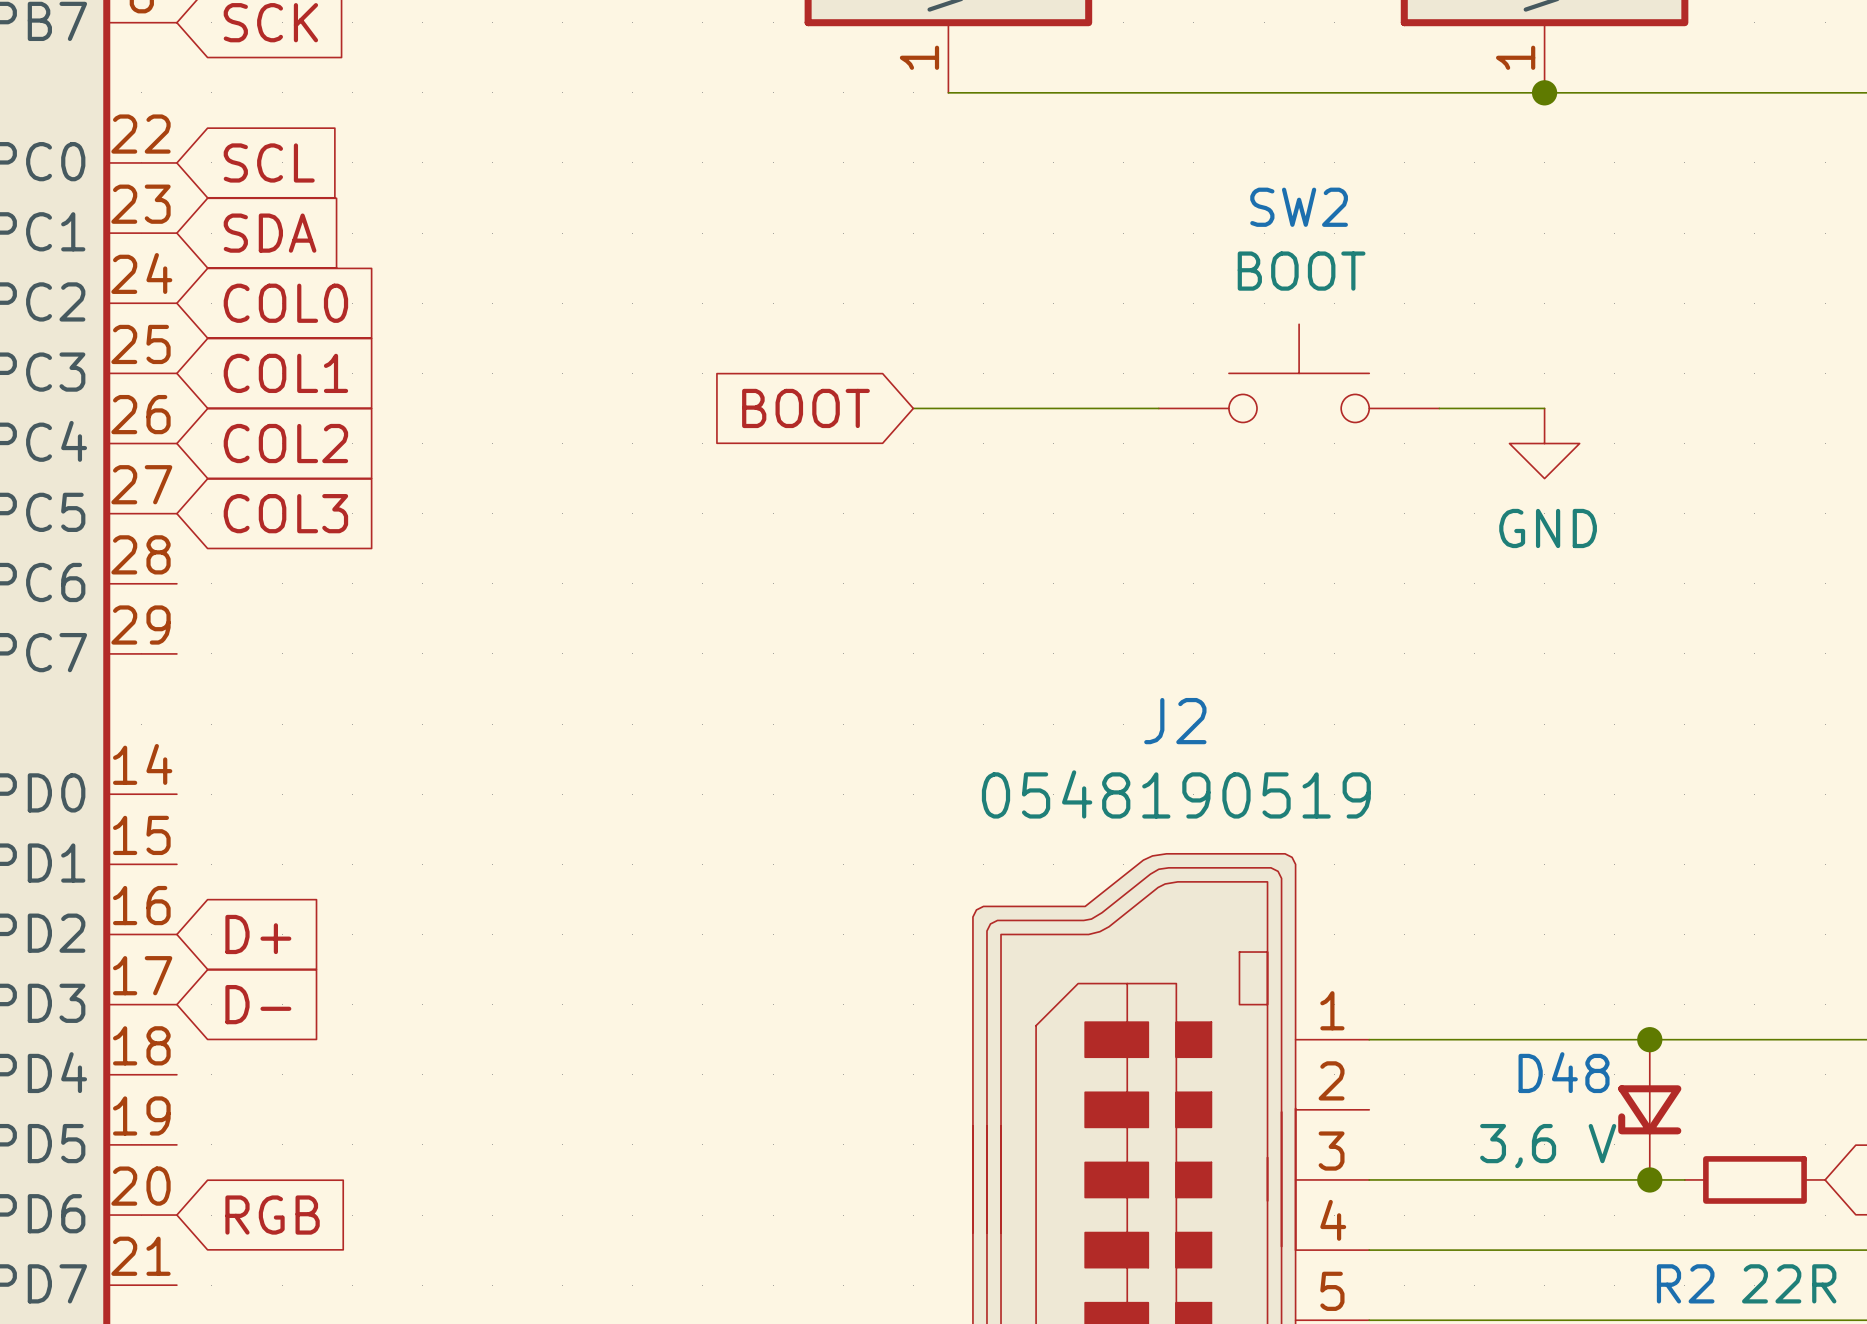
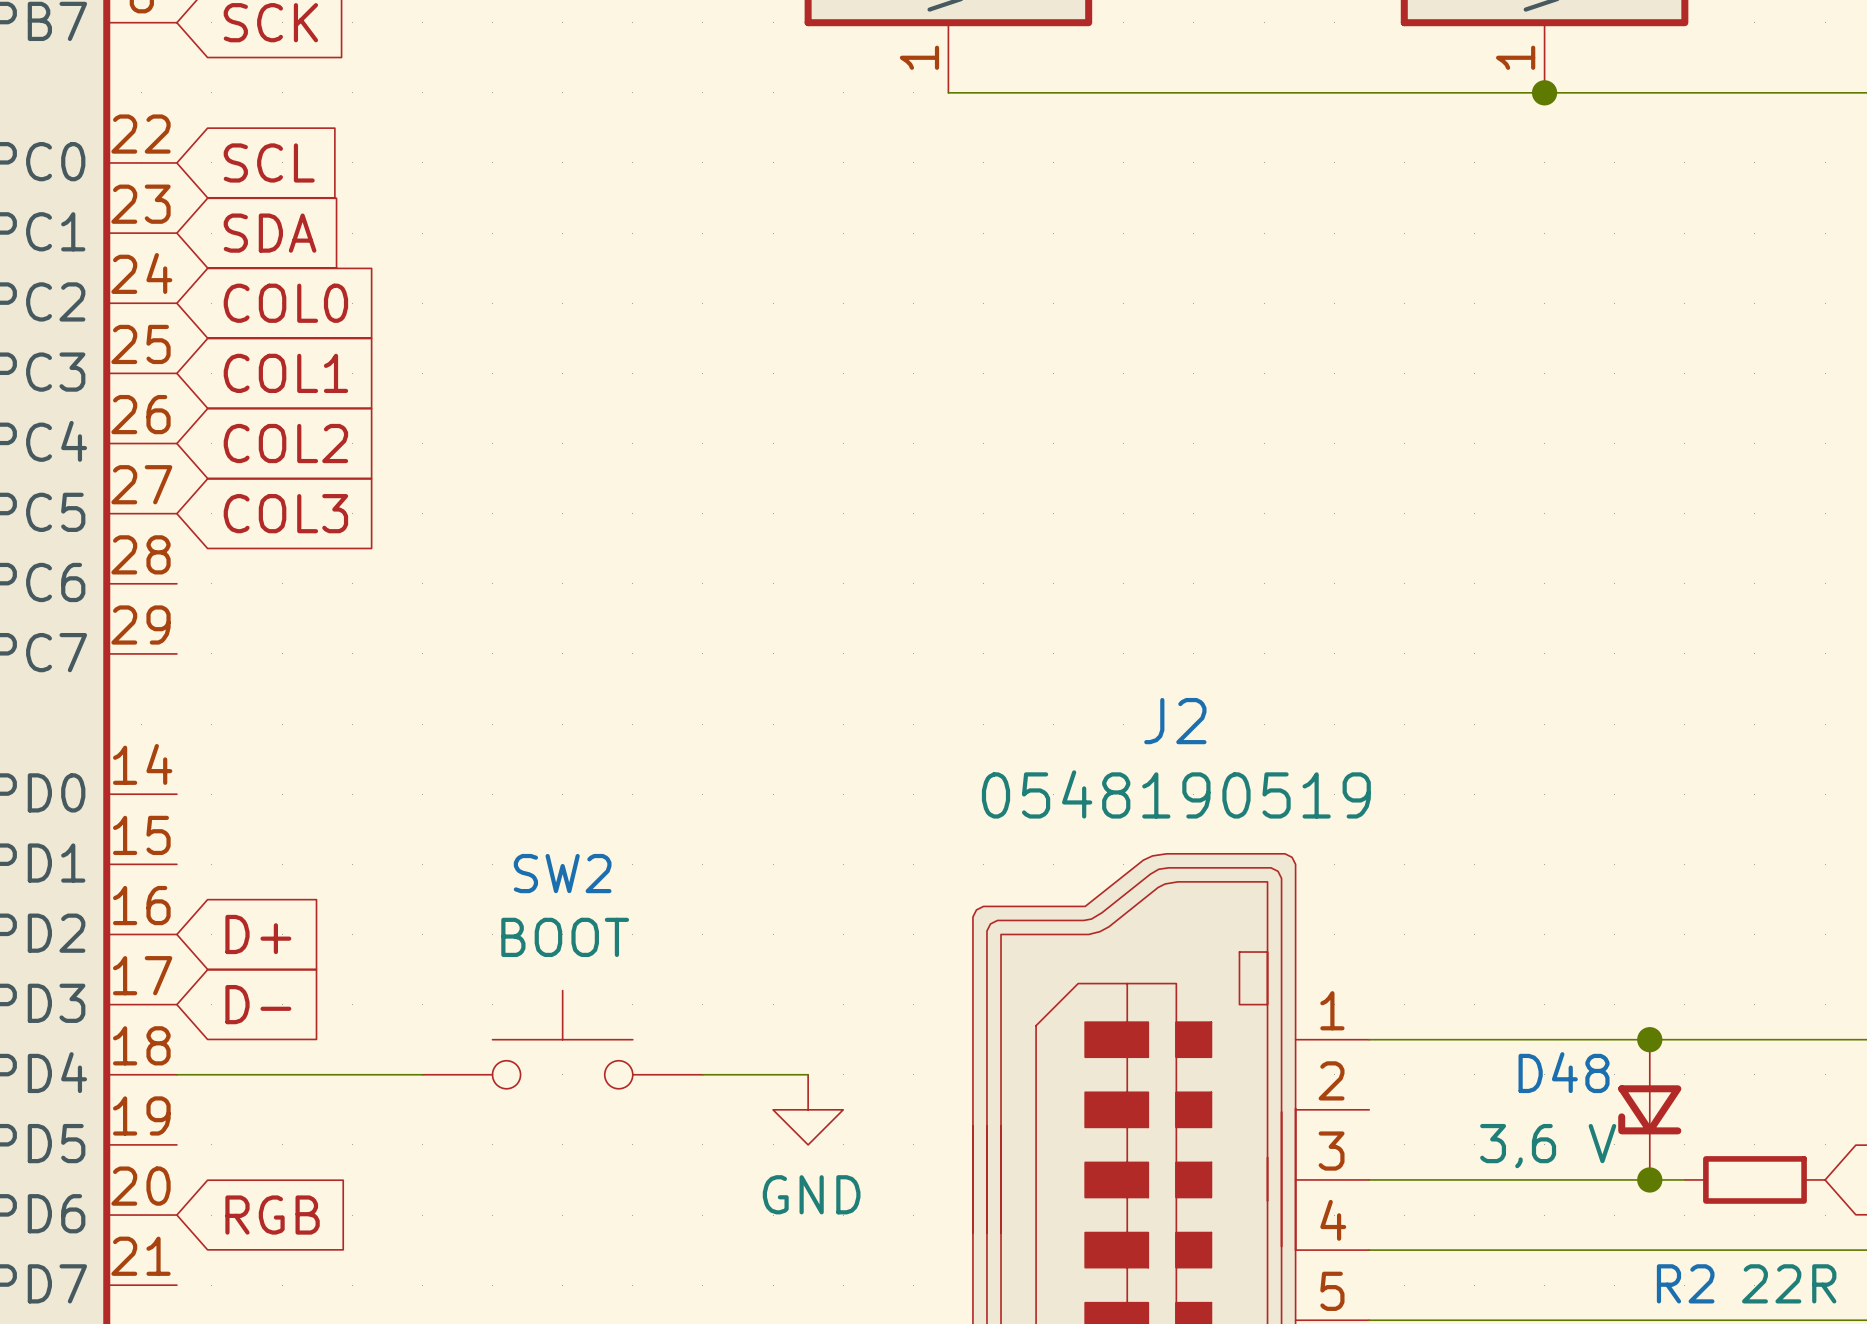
SW2 position: (1299, 373) -> (562, 1039)
global label: BOOT (805, 408) -> none
wire: (913, 408) (1158, 408) -> none
wire: (1439, 408) (1544, 408) -> none
power symbol: GND (1544, 443) -> none
wire: none -> (176, 1074) (422, 1074)
wire: none -> (702, 1074) (808, 1074)
power symbol: none -> GND (808, 1109)

